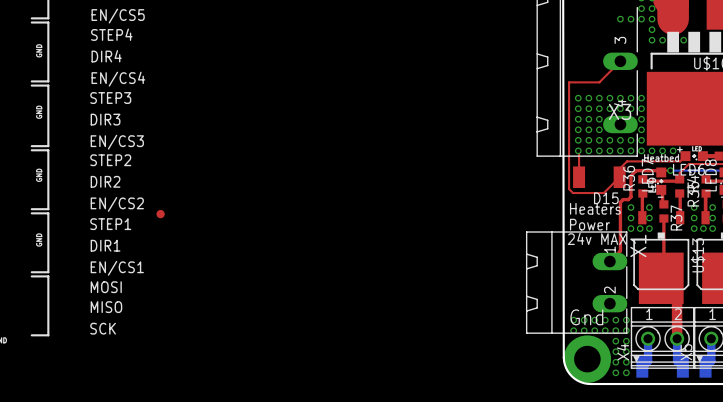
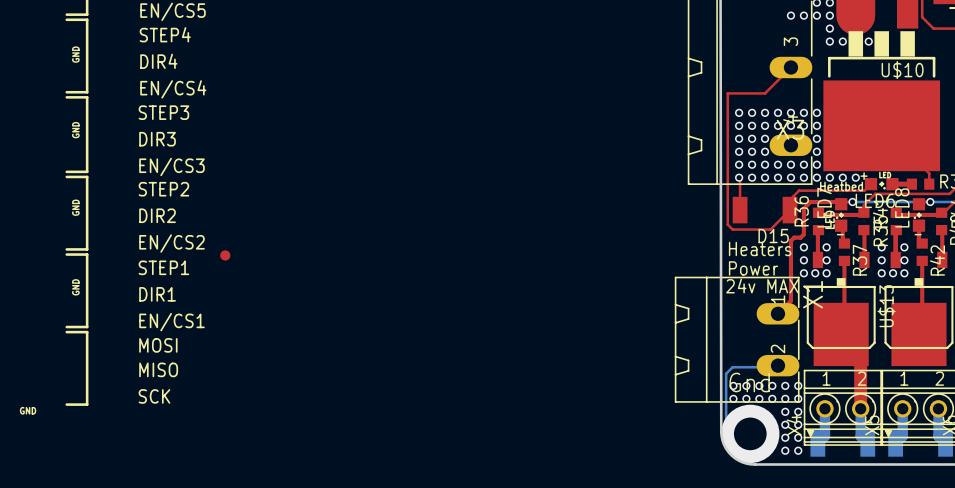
bottom track: none -> (778, 365) (776, 367) (732, 367) (726, 373) (726, 425) (736, 433) (750, 433)

